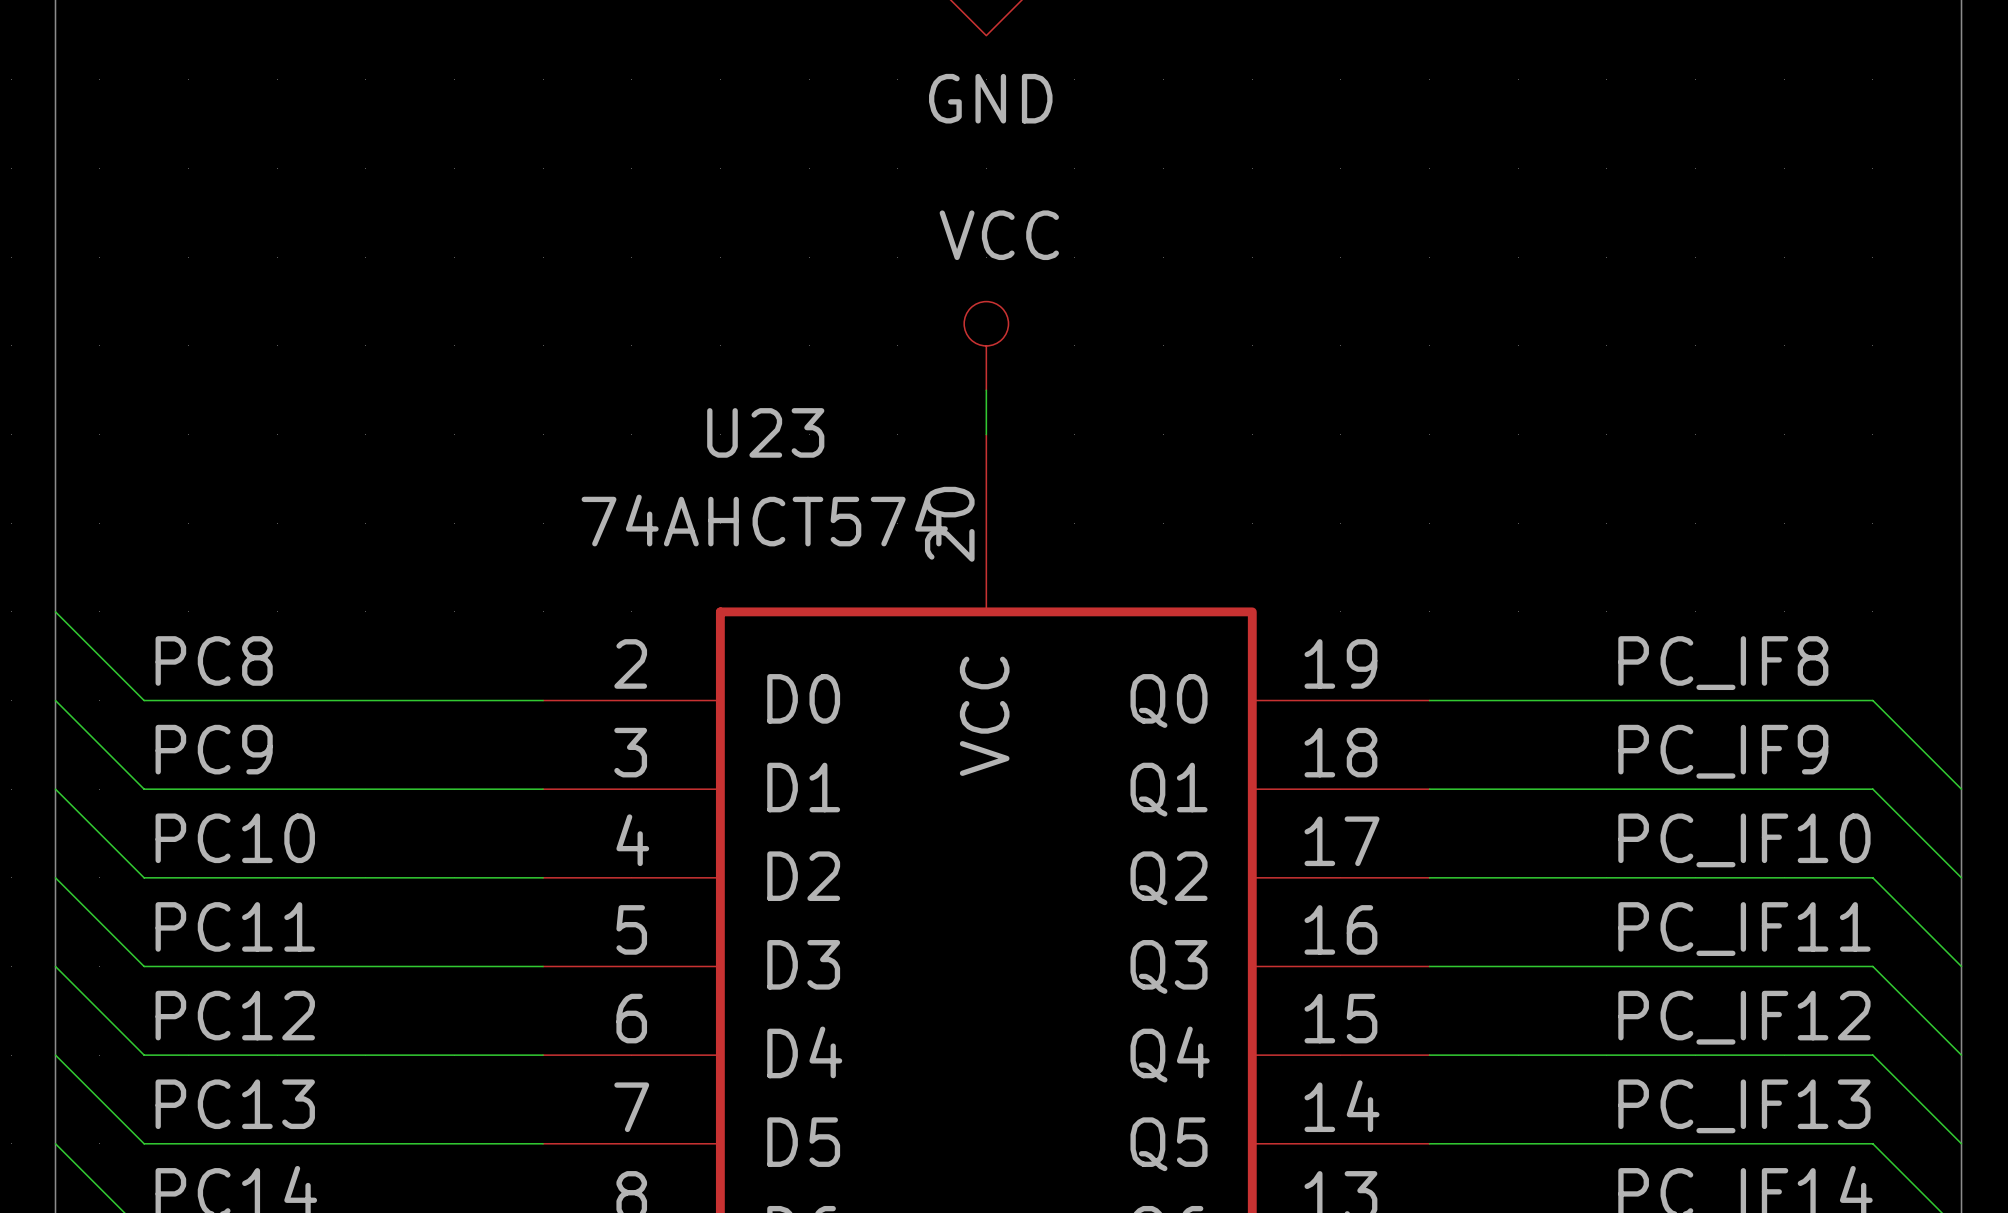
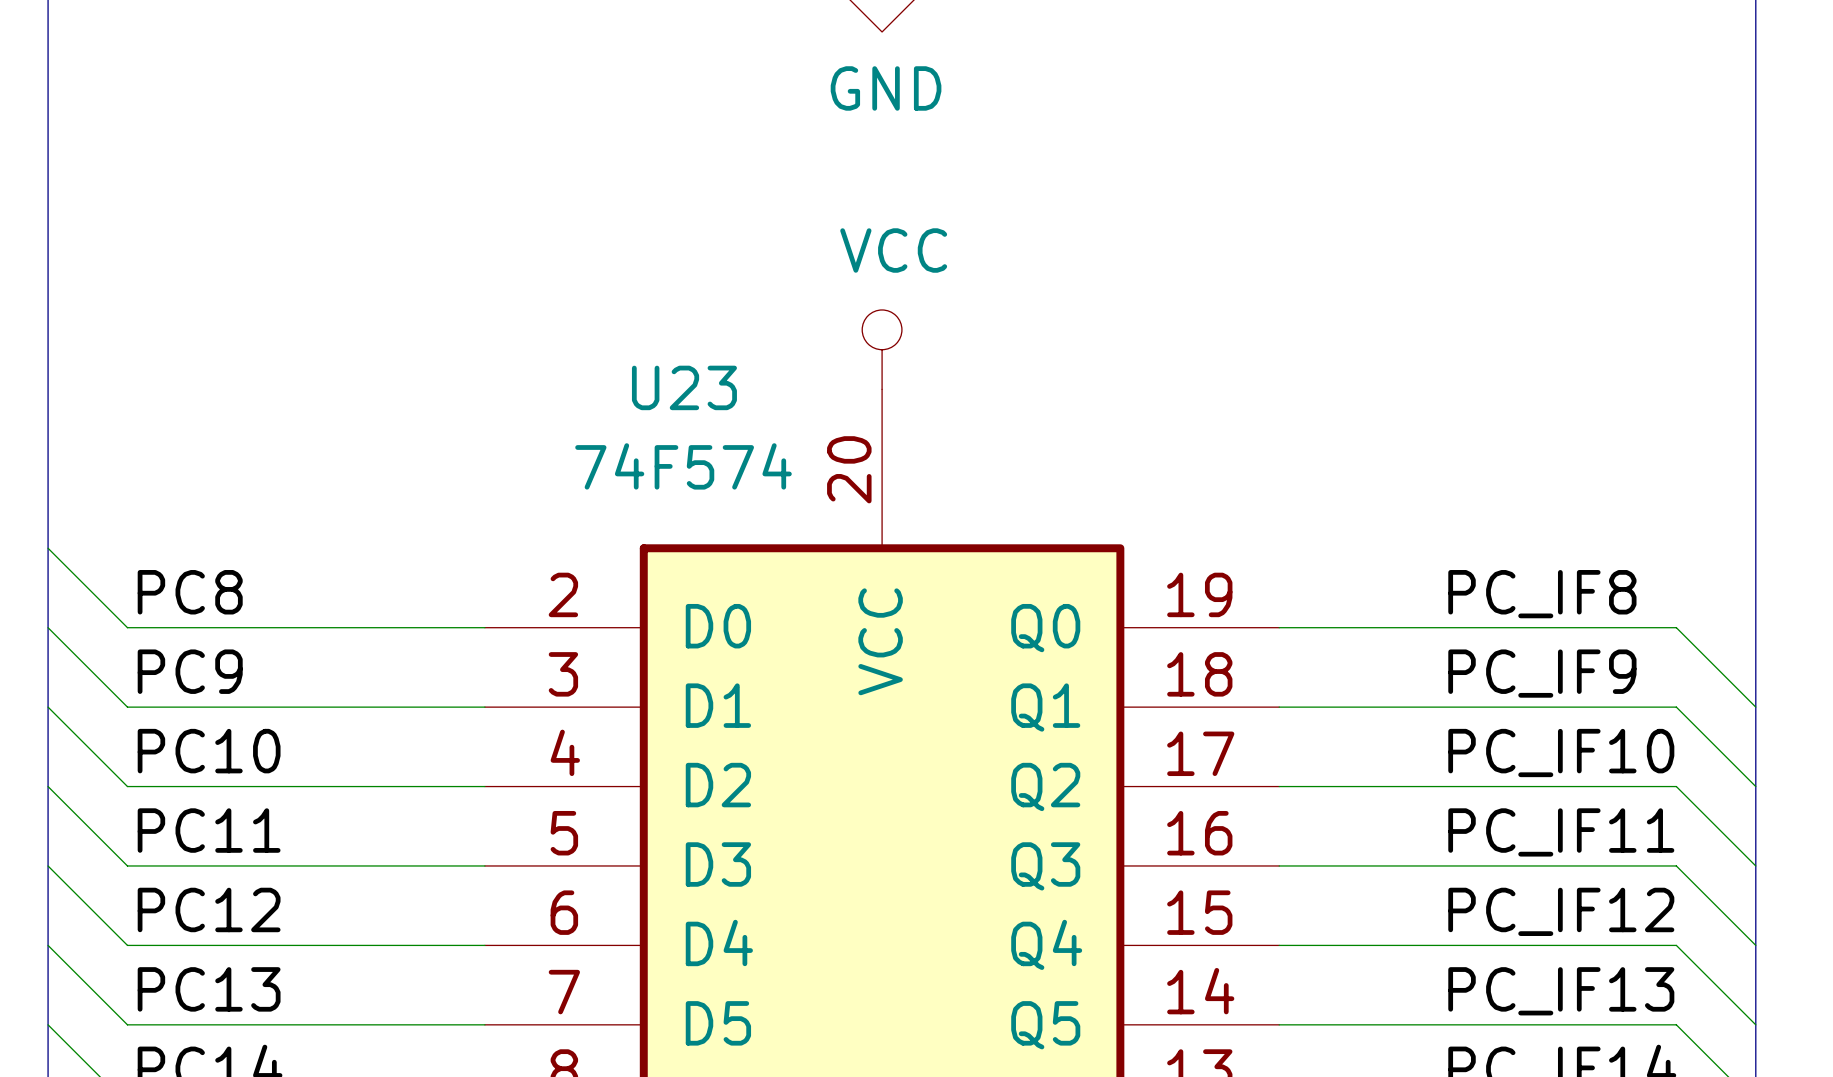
power symbol position: VCC (986, 345) -> VCC (882, 349)
U23 value: 74AHCT574 (764, 520) -> 74F574 (683, 466)

